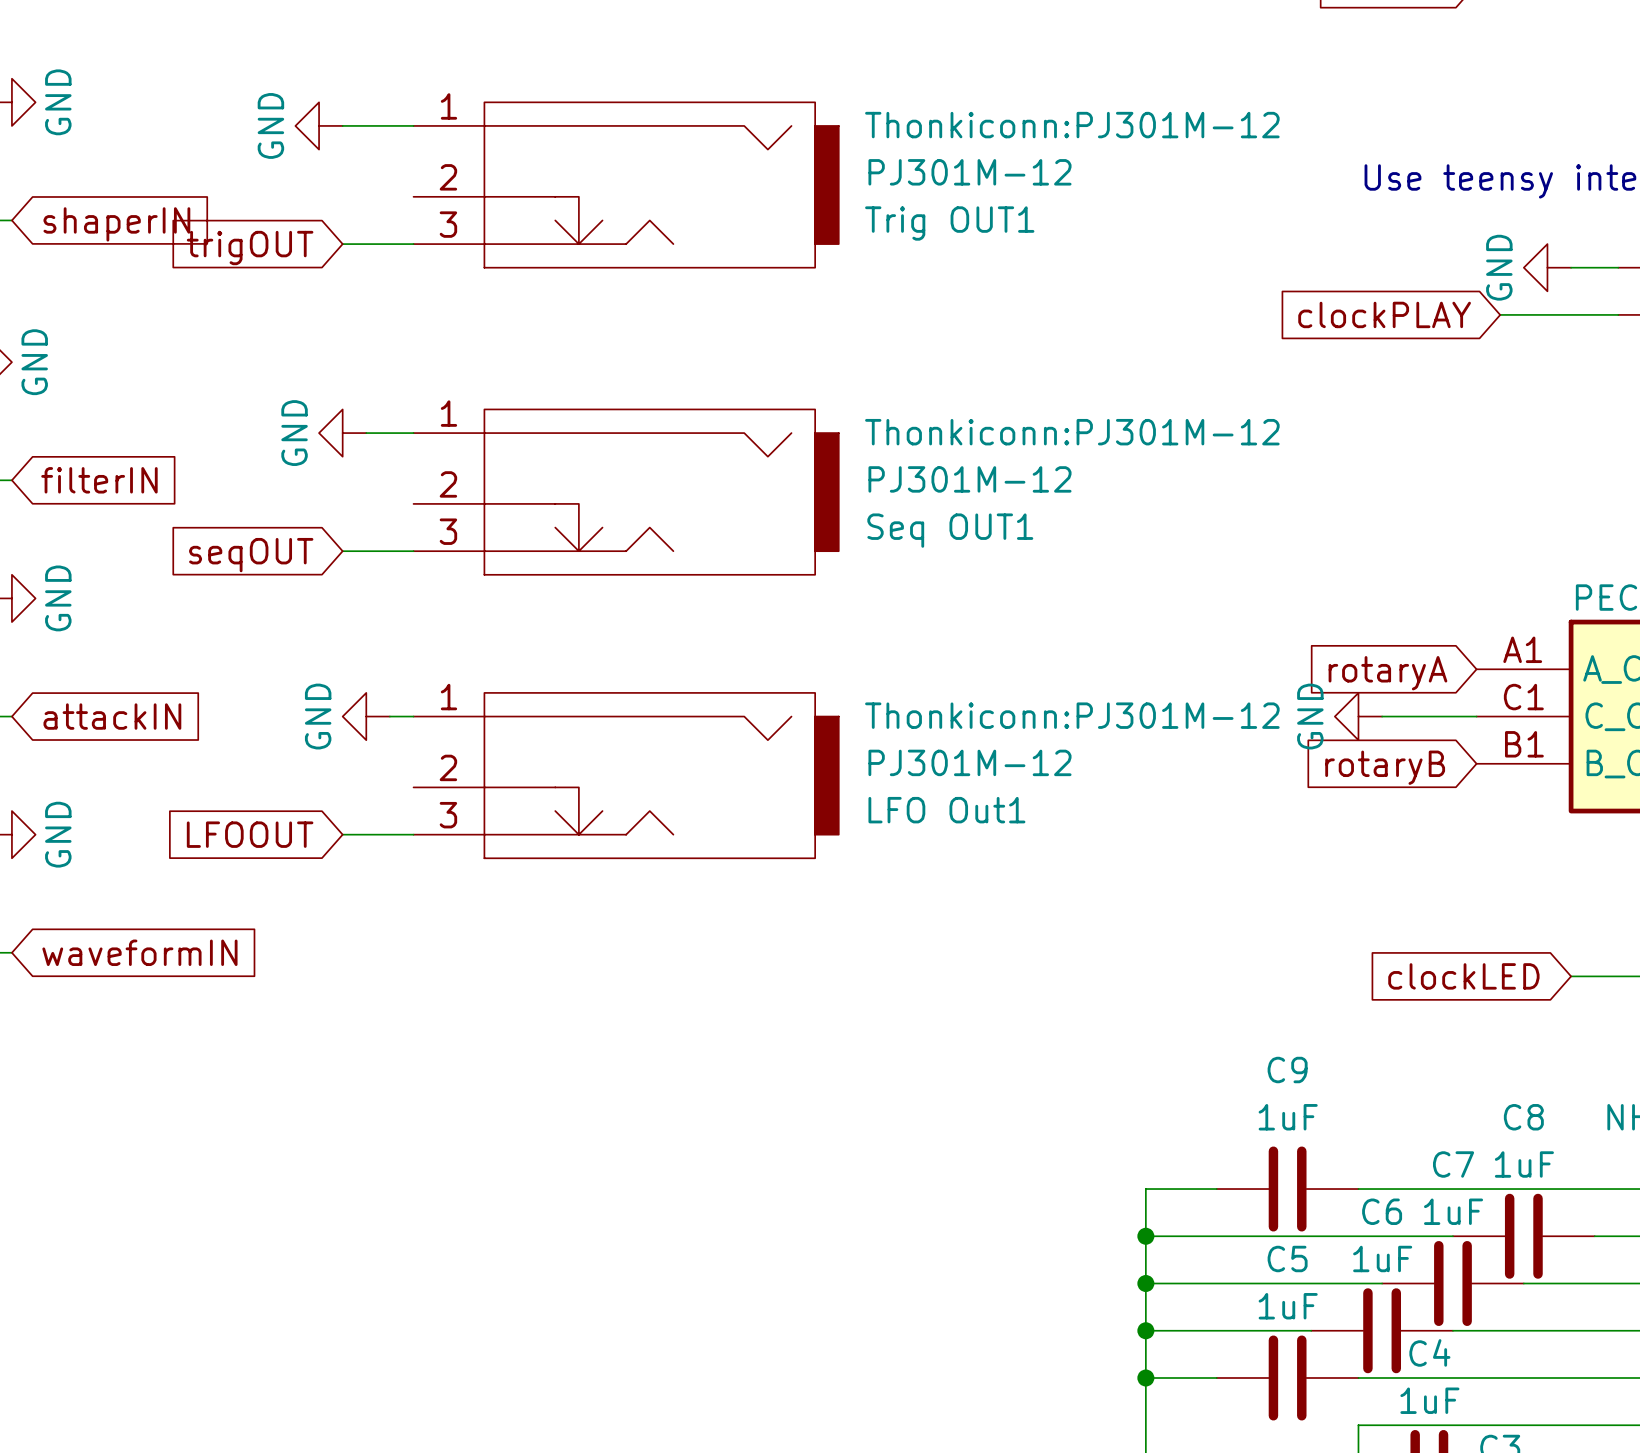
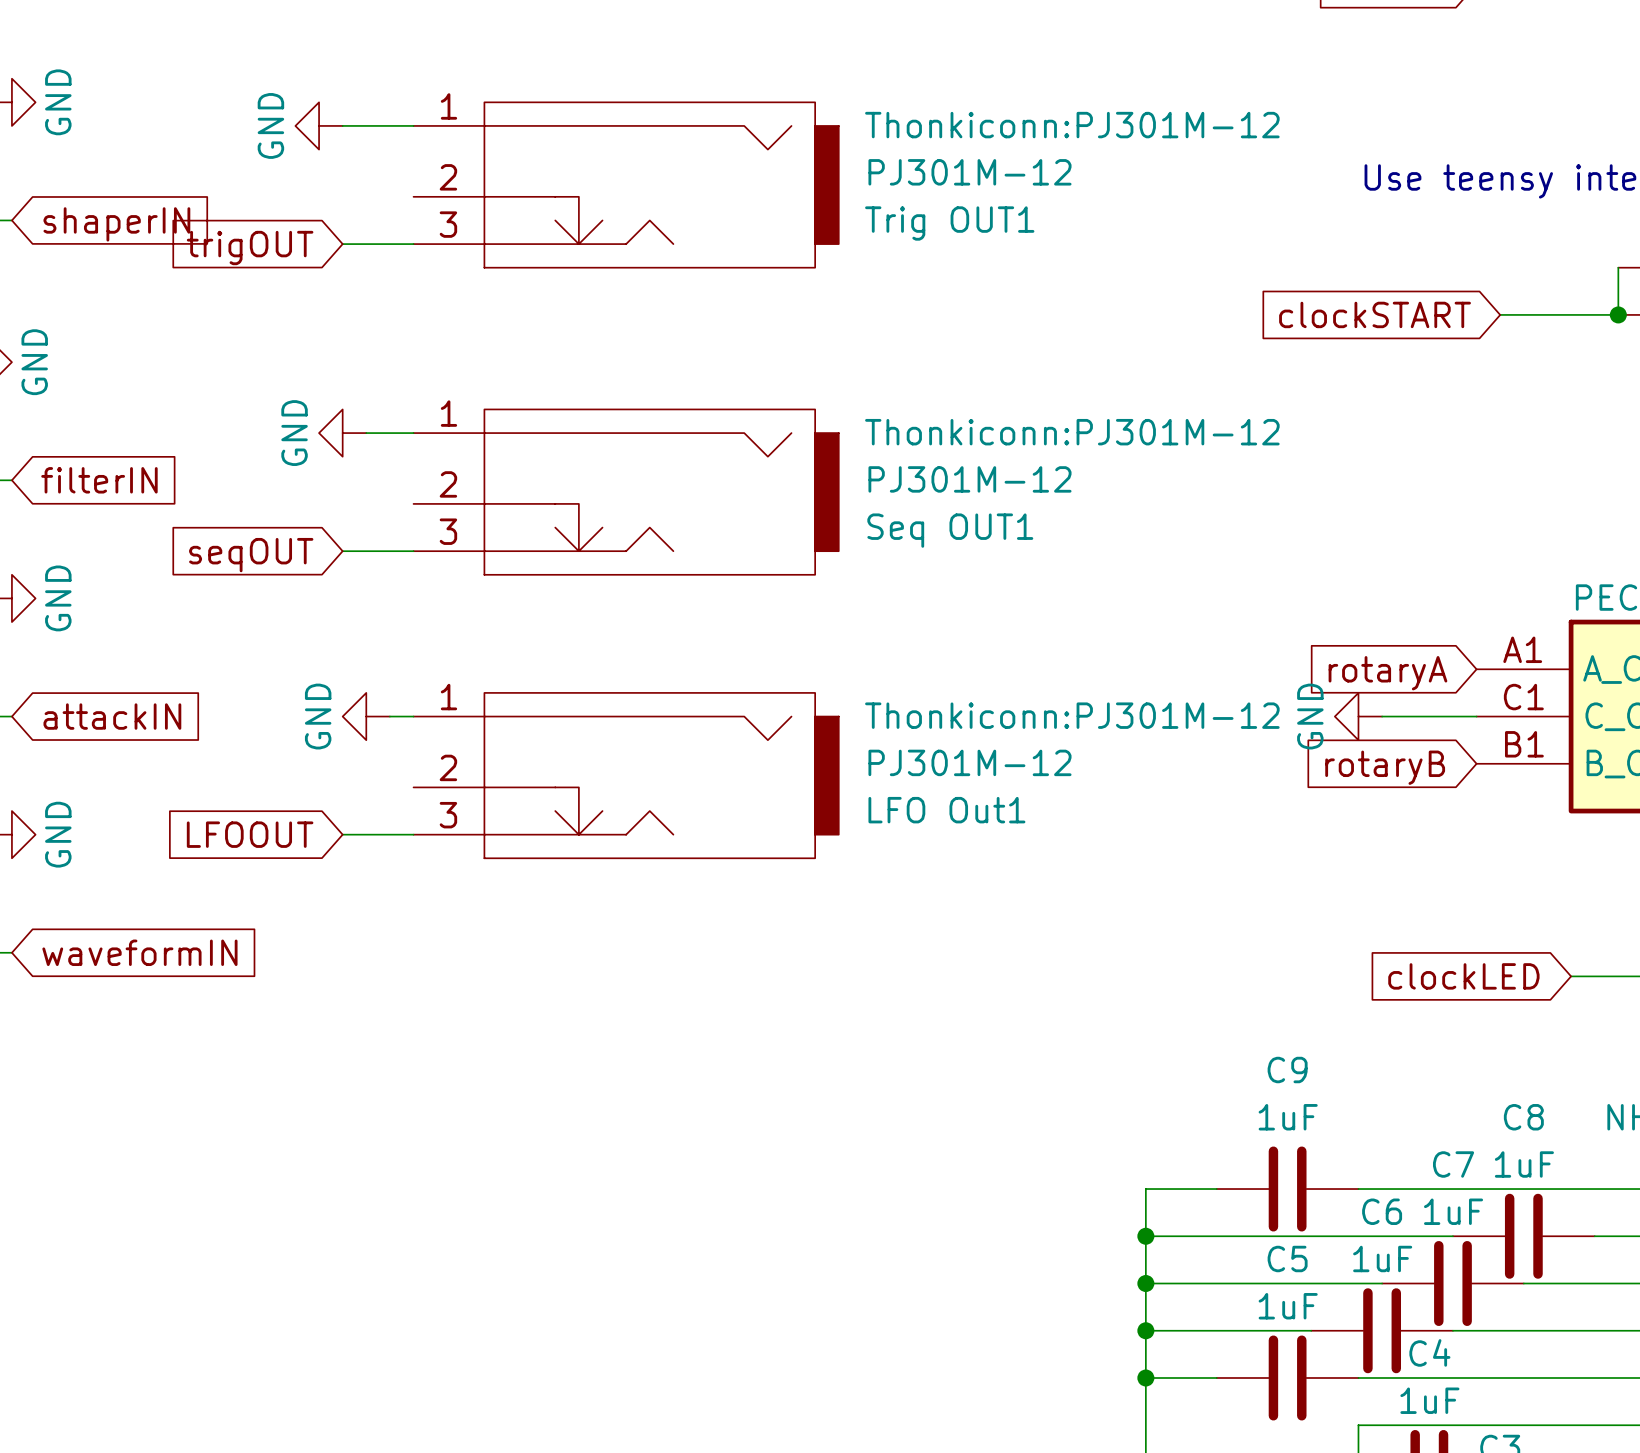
power symbol: GND (1547, 267) -> none
wire: (1571, 267) (1618, 267) -> (1618, 314) (1618, 267)
global label: clockPLAY (1384, 314) -> clockSTART (1375, 314)
junction: none -> (1618, 314)

